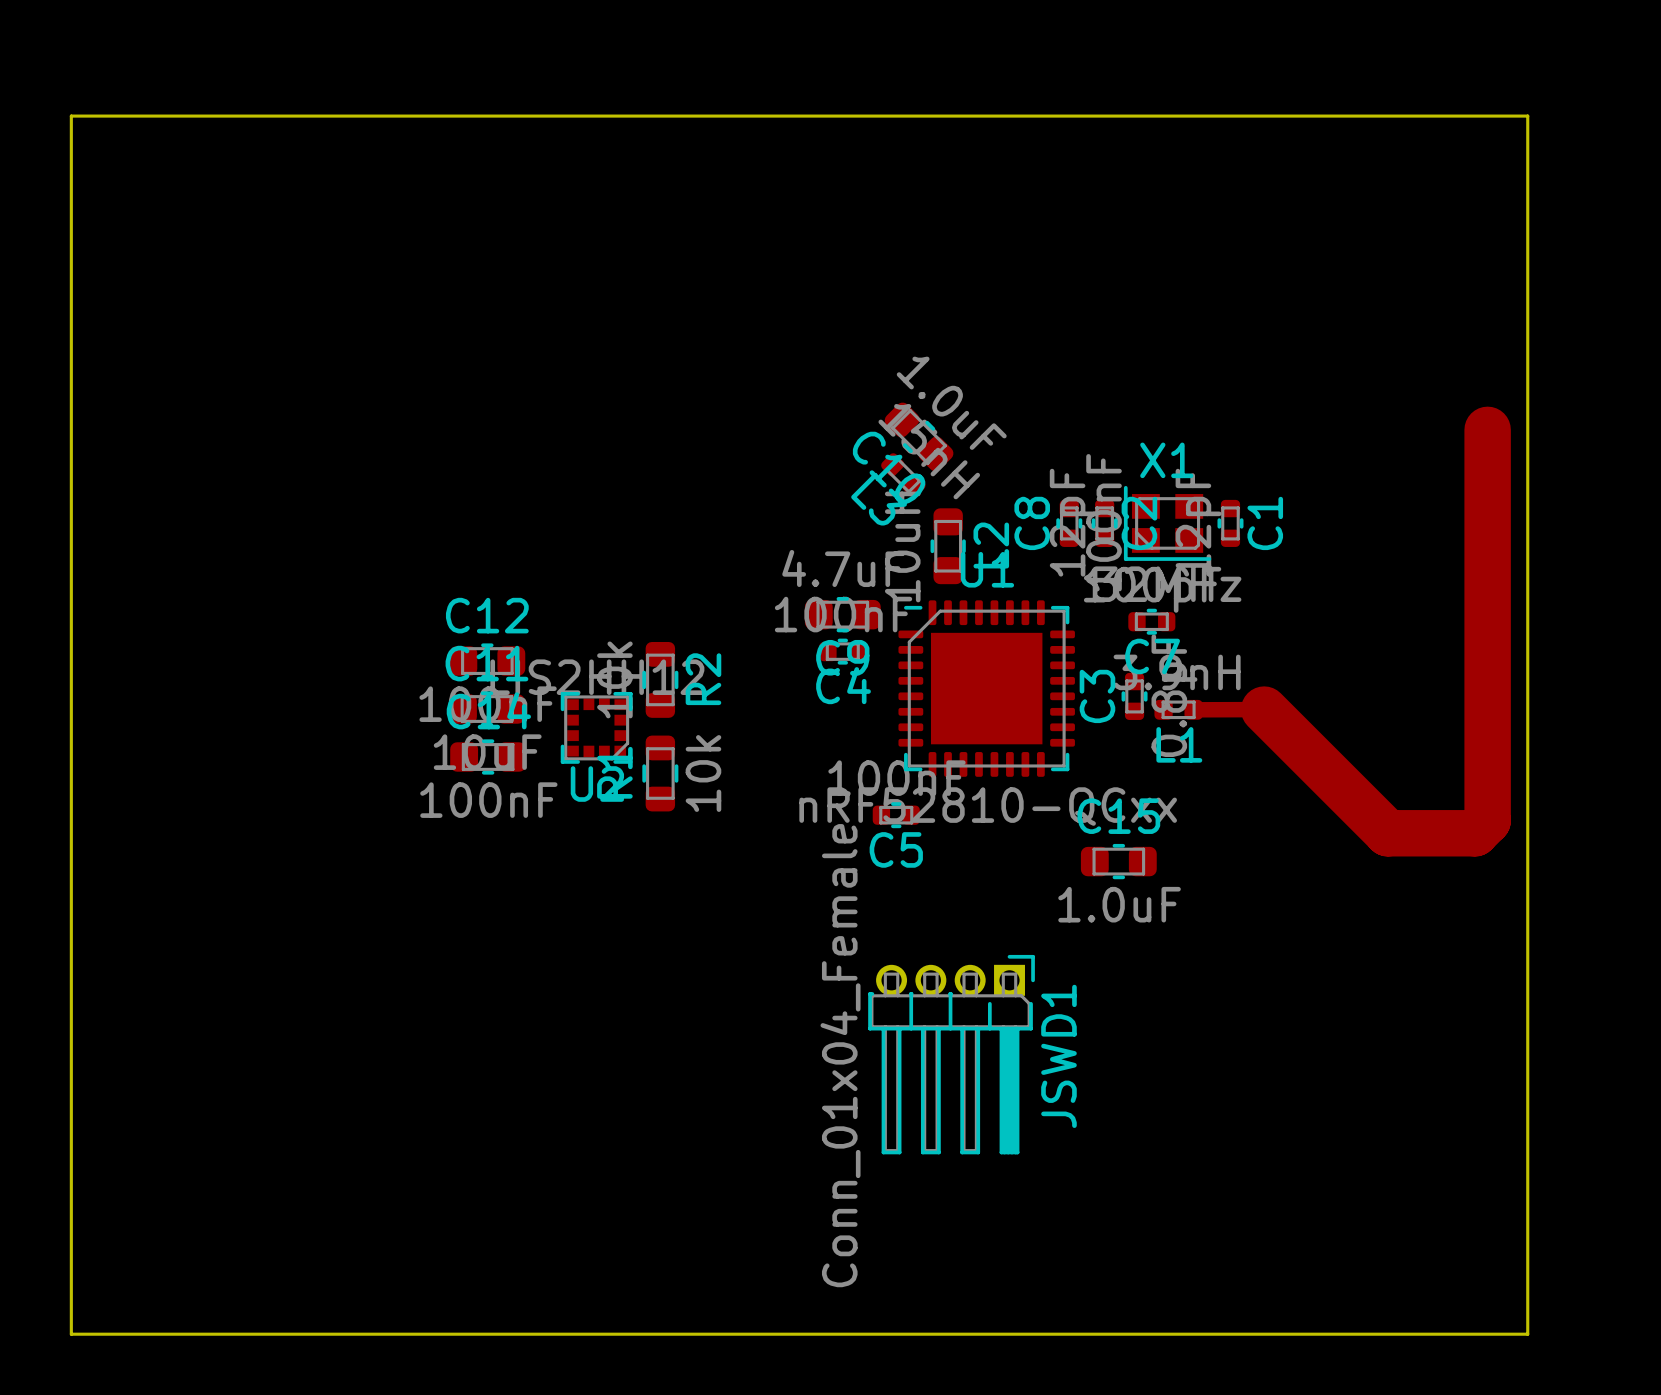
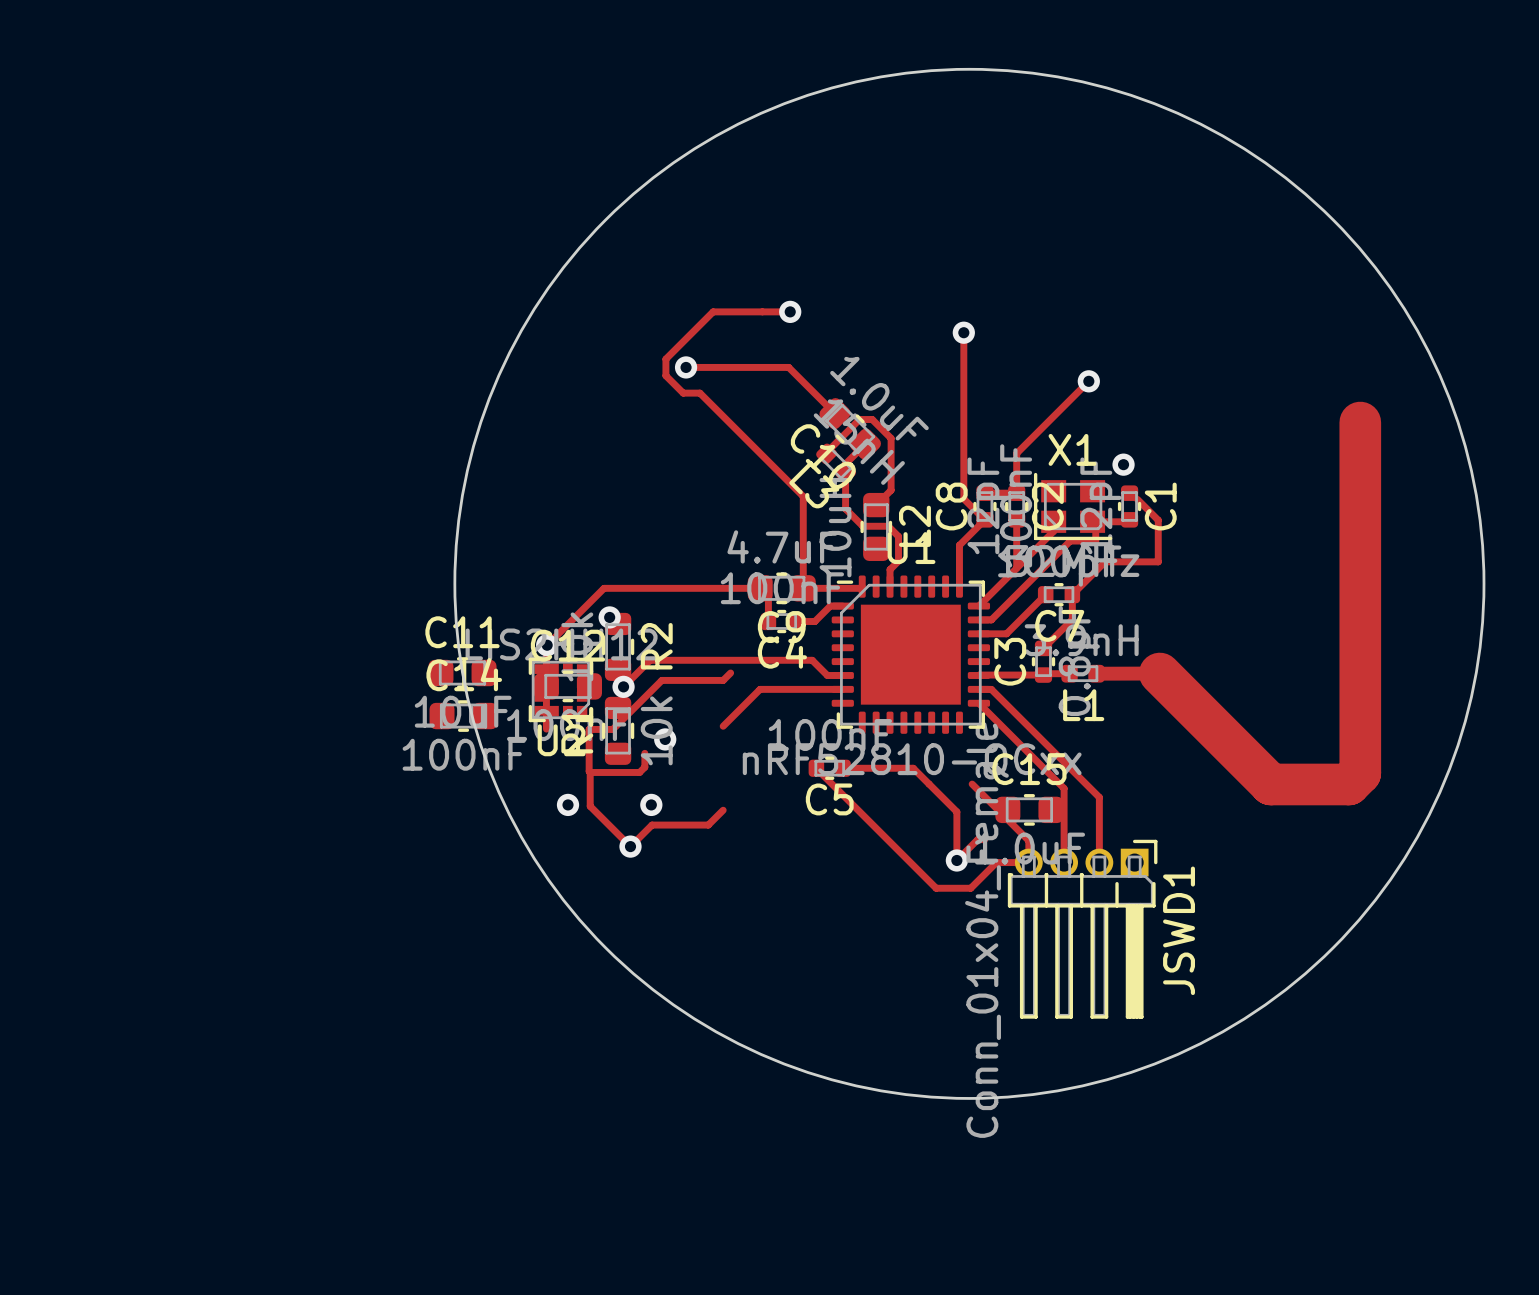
round board edge: none -> [453, 67, 1486, 1100]
board edge: (71, 116) (1527, 116) (1527, 1334) (71, 1334) (71, 116) -> none
track: none -> (790, 311) (713, 311) (665, 359) (665, 375) (683, 393) (699, 393) (803, 496) (803, 588)
via: none -> (790, 311)
track: none -> (963, 332) (963, 498) (984, 519)
via: none -> (963, 332)
track: none -> (686, 367) (788, 367) (834, 413)
via: none -> (686, 367)
track: none -> (1088, 381) (1016, 453) (1016, 493) (984, 493)
via: none -> (1088, 381)
track: none -> (865, 444) (845, 463) (845, 508) (862, 526) (888, 526) (898, 536) (898, 561) (890, 569) (890, 586)
track: none -> (826, 453) (859, 419) (872, 419) (891, 438) (891, 490) (876, 505)
via: none -> (1123, 464)
track: none -> (1137, 499) (1158, 520) (1158, 561) (1105, 561) (1072, 594) (1072, 619) (1043, 648)
track: none -> (984, 519) (959, 545) (959, 586)
track: none -> (1016, 519) (1016, 568)
track: none -> (1129, 519) (1127, 521) (1092, 521) (1095, 524) (1095, 541) (1070, 541) (991, 619) (978, 619)
track: none -> (1053, 521) (1053, 531) (978, 606)
track: none -> (862, 586) (860, 588) (803, 588)
track: none -> (1045, 594) (1006, 633) (978, 633)
track: none -> (842, 606) (830, 606) (814, 621) (795, 621)
via: none -> (609, 617)
track: none -> (768, 621) (768, 596) (760, 588) (604, 588) (546, 645) (546, 729)
C12 position: (487, 661) -> (567, 686)
via: none -> (547, 645)
track: none -> (730, 672) (723, 680) (661, 680) (612, 729) (589, 729) (590, 772)
track: none -> (1069, 673) (978, 675)
track: none -> (842, 675) (827, 675) (812, 660) (650, 660) (623, 686)
via: none -> (623, 686)
track: none -> (842, 689) (760, 689) (723, 726)
track: none -> (978, 689) (991, 689) (1099, 797) (1099, 862)
track: none -> (978, 703) (1064, 788) (1064, 862)
via: none -> (665, 739)
track: none -> (644, 753) (644, 767) (639, 772) (590, 772)
track: none -> (816, 768) (936, 888) (970, 888) (996, 862) (1028, 862) (1028, 840) (972, 784)
track: none -> (843, 768) (913, 768) (956, 811) (956, 860) (977, 839) (984, 839)
track: none -> (590, 772) (590, 806) (630, 846) (652, 825) (708, 825) (723, 810)
via: none -> (568, 804)
via: none -> (651, 804)
via: none -> (630, 846)
via: none -> (956, 860)
JSWD1 position: (951, 1054) -> (1082, 929)

